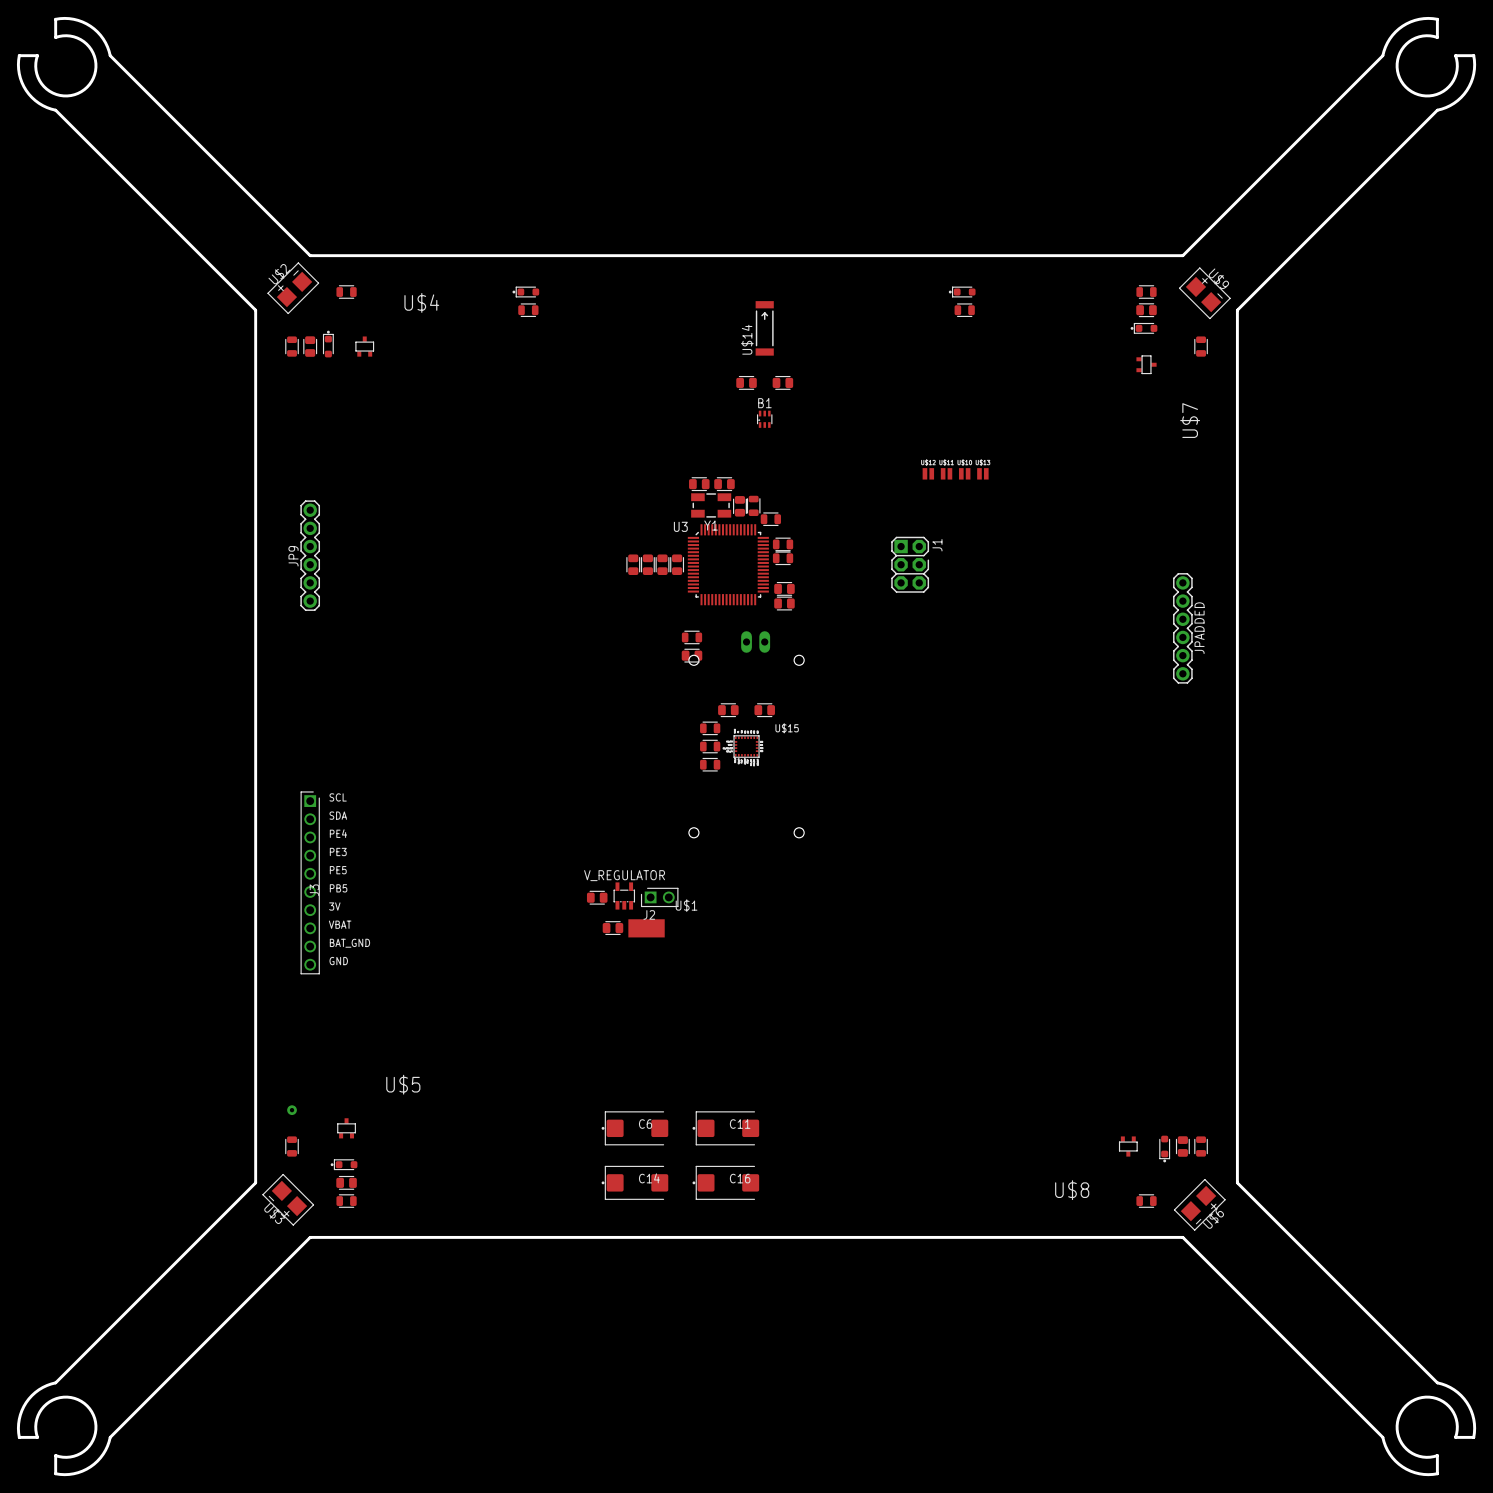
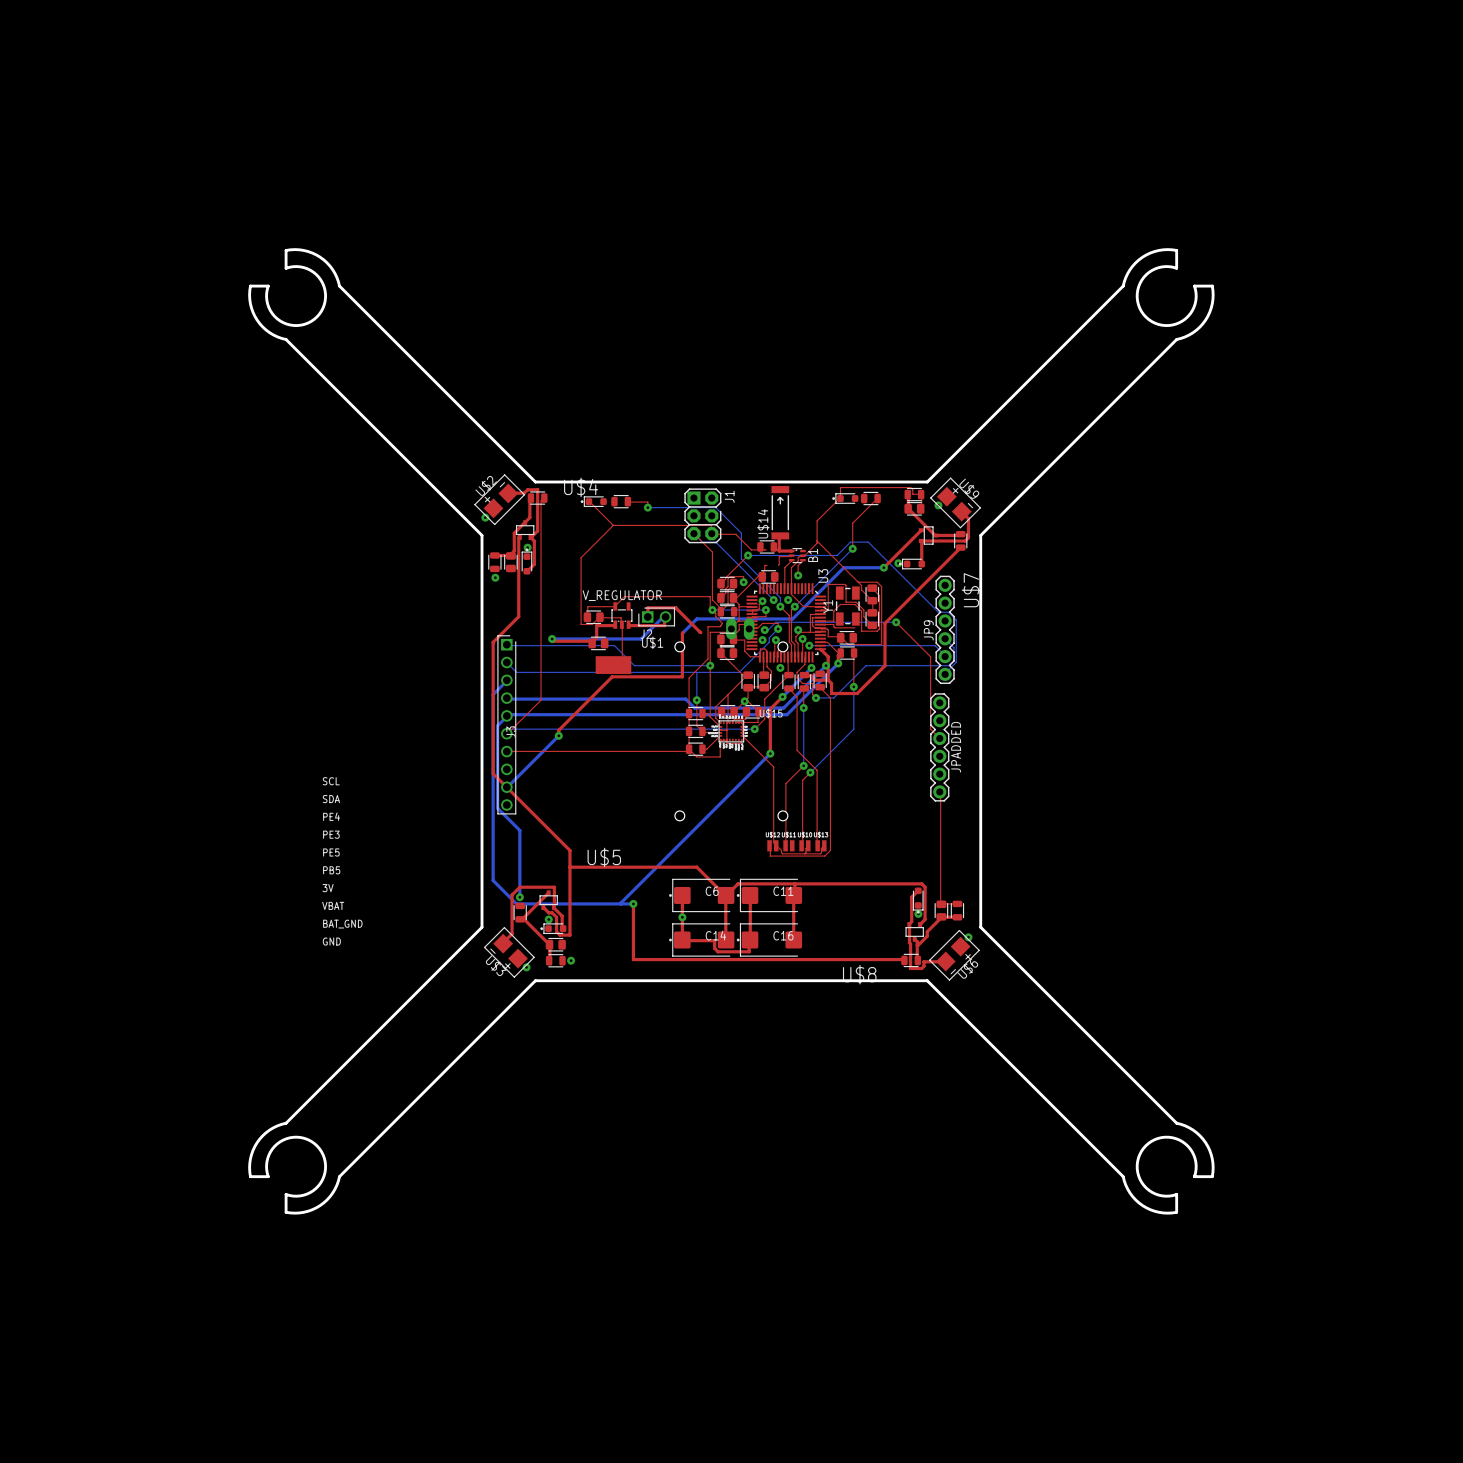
board edge: (55, 19) (55, 37) (66, 35) (77, 38) (91, 49) (95, 63) (93, 78) (87, 87) (78, 93) (67, 95) (56, 94) (44, 86) (38, 77) (35, 66) (37, 55) (19, 55) (19, 73) (26, 90) (38, 103) (55, 110) (255, 310) (255, 1182) (55, 1382) (42, 1387) (31, 1395) (20, 1414) (19, 1437) (37, 1437) (35, 1426) (38, 1415) (49, 1401) (63, 1397) (78, 1399) (87, 1405) (93, 1415) (95, 1425) (94, 1436) (86, 1449) (77, 1455) (66, 1457) (55, 1455) (55, 1473) (73, 1473) (90, 1466) (103, 1454) (110, 1437) (310, 1237) (1182, 1237) (1382, 1437) (1387, 1450) (1395, 1461) (1414, 1472) (1437, 1473) (1437, 1455) (1426, 1457) (1415, 1455) (1401, 1443) (1397, 1429) (1399, 1415) (1405, 1405) (1415, 1399) (1425, 1397) (1436, 1398) (1449, 1406) (1455, 1415) (1457, 1426) (1455, 1437) (1473, 1437) (1473, 1419) (1466, 1402) (1454, 1389) (1437, 1382) (1237, 1182) (1237, 310) (1437, 110) (1450, 105) (1461, 97) (1472, 78) (1473, 55) (1455, 55) (1457, 66) (1455, 77) (1443, 91) (1429, 95) (1415, 93) (1405, 87) (1399, 78) (1397, 67) (1398, 56) (1406, 44) (1415, 38) (1426, 35) (1437, 37) (1437, 19) (1419, 19) (1402, 26) (1389, 38) (1382, 55) (1182, 255) (310, 255) (110, 55) (105, 42) (97, 31) (78, 20) (55, 19) -> none
board edge: none -> (286, 250) (286, 268) (296, 266) (307, 268) (321, 280) (325, 293) (323, 308) (316, 316) (308, 323) (297, 325) (286, 324) (274, 316) (268, 307) (266, 296) (268, 286) (250, 286) (250, 303) (257, 320) (269, 332) (286, 339) (482, 535) (482, 927) (286, 1123) (273, 1127) (262, 1135) (251, 1154) (250, 1176) (268, 1176) (266, 1165) (268, 1155) (280, 1141) (293, 1137) (308, 1139) (316, 1145) (323, 1154) (325, 1165) (324, 1175) (316, 1188) (307, 1193) (296, 1196) (286, 1194) (286, 1212) (303, 1212) (320, 1205) (332, 1193) (339, 1176) (535, 980) (927, 980) (1123, 1176) (1127, 1189) (1135, 1199) (1154, 1211) (1176, 1212) (1176, 1194) (1165, 1196) (1155, 1193) (1141, 1182) (1137, 1168) (1139, 1154) (1145, 1145) (1154, 1139) (1165, 1137) (1175, 1138) (1188, 1146) (1193, 1155) (1196, 1165) (1194, 1176) (1212, 1176) (1212, 1158) (1205, 1142) (1193, 1130) (1176, 1123) (980, 927) (980, 535) (1176, 339) (1189, 335) (1199, 327) (1211, 308) (1212, 286) (1194, 286) (1196, 296) (1193, 307) (1182, 321) (1168, 325) (1154, 323) (1145, 316) (1139, 308) (1137, 297) (1138, 286) (1146, 274) (1155, 268) (1165, 266) (1176, 268) (1176, 250) (1158, 250) (1142, 257) (1130, 269) (1123, 286) (927, 482) (535, 482) (339, 286) (335, 273) (327, 262) (308, 251) (286, 250)
U$2 position: (293, 288) -> (499, 499)
part: (346, 292) -> none
part: (525, 292) -> none
part: (962, 292) -> none
part: (1146, 292) -> none
U$9 position: (1204, 293) -> (955, 502)
part: (528, 310) -> none
part: (964, 310) -> none
part: (1146, 310) -> none
U$14 position: (764, 328) -> (780, 512)
part: (1144, 328) -> none
part: (328, 344) -> none
part: (292, 346) -> none
part: (310, 346) -> none
U$4 position: (364, 346) -> (525, 530)
part: (1201, 346) -> none
U$7 position: (1146, 364) -> (928, 535)
part: (746, 382) -> none
part: (782, 382) -> none
B1 rotation: 0° (764, 419) -> 90° clockwise (797, 555)
B1 position: (764, 419) -> (797, 555)
part position: (928, 473) -> (772, 845)
part position: (946, 473) -> (788, 845)
part position: (964, 473) -> (804, 845)
part position: (982, 473) -> (820, 845)
part: (699, 484) -> none
part: (724, 484) -> none
top track: none -> (508, 493) (524, 493) (527, 489) (537, 489) (537, 530) (530, 537) (534, 541) (534, 564) (526, 571)
top track: none -> (907, 494) (908, 508) (935, 535) (960, 534)
part: none -> (914, 494)
Y1 rotation: 0° (711, 505) -> 90° clockwise (847, 606)
Y1 position: (711, 505) -> (847, 606)
part: (753, 505) -> none
part: (739, 506) -> none
top track: none -> (530, 498) (529, 517) (514, 533) (514, 551) (510, 555) (494, 555)
part: none -> (537, 498)
top track: none -> (544, 498) (541, 500) (541, 700) (506, 733)
part: none -> (845, 498)
part: none -> (870, 498)
top track: none -> (877, 498) (852, 523) (852, 548)
top track: none -> (588, 501) (613, 525)
part: none -> (593, 501)
part: none -> (621, 501)
top track: none -> (627, 501) (647, 502) (647, 507)
via: none -> (938, 505)
bottom track: none -> (647, 507) (715, 507) (741, 533) (741, 558) (780, 597) (780, 606)
via: none -> (647, 507)
part: (770, 519) -> none
part: none -> (914, 508)
top track: none -> (920, 508) (921, 495) (912, 494) (910, 487) (840, 487) (840, 498) (817, 520) (817, 543) (803, 556) (799, 556) (798, 561) (791, 567) (791, 594) (803, 606) (820, 607)
top track: none -> (961, 511) (968, 518) (968, 537) (965, 541) (921, 540) (921, 564)
via: none -> (485, 517)
top track: none -> (613, 525) (711, 525) (712, 534) (735, 534) (751, 549) (766, 549)
top track: none -> (613, 525) (581, 557) (581, 624) (592, 624) (599, 617) (621, 617) (622, 665)
top track: none -> (921, 530) (883, 567)
top track: none -> (693, 533) (712, 552) (712, 600) (722, 610) (720, 611) (728, 604) (728, 589) (733, 583)
bottom track: none -> (693, 533) (702, 542) (715, 542) (773, 600)
part: (783, 544) -> none
top track: none -> (780, 535) (779, 551) (791, 551)
top track: none -> (519, 537) (518, 616) (493, 642) (493, 773) (569, 850) (569, 935) (559, 935) (556, 931) (556, 917) (543, 907)
top track: none -> (817, 541) (861, 585) (861, 589) (872, 601) (872, 612)
part: none -> (960, 540)
JP9 position: (310, 555) -> (945, 629)
via: none -> (527, 547)
top track: none -> (960, 547) (885, 623) (885, 665) (857, 693) (831, 693) (831, 683) (828, 680)
bottom track: none -> (852, 548) (794, 606)
via: none -> (852, 548)
part: (633, 564) -> none
part: (647, 564) -> none
part: (662, 564) -> none
part: (677, 564) -> none
U3 rotation: 0° (728, 564) -> 90° clockwise (786, 622)
U3 position: (728, 564) -> (786, 622)
J1 position: (910, 564) -> (702, 515)
top track: none -> (748, 555) (721, 583)
bottom track: none -> (748, 555) (837, 555) (850, 542) (868, 542) (938, 612) (948, 612) (956, 620) (956, 662) (945, 674)
via: none -> (748, 555)
top track: none -> (791, 555) (779, 556) (778, 565)
top track: none -> (791, 560) (784, 567) (784, 588)
top track: none -> (802, 560) (798, 565) (798, 575)
part: none -> (494, 562)
part: none -> (510, 562)
part: none -> (526, 561)
via: none -> (898, 563)
part: none -> (911, 564)
top track: none -> (766, 565) (764, 565) (764, 569) (734, 600) (733, 597) (733, 598) (739, 604) (739, 621)
bottom track: none -> (883, 567) (843, 567) (792, 618) (696, 618) (683, 632)
via: none -> (883, 567)
via: none -> (798, 575)
via: none -> (495, 577)
top track: none -> (743, 582) (743, 576) (730, 576) (728, 578) (725, 593) (720, 597)
via: none -> (743, 582)
top track: none -> (858, 582) (877, 582) (881, 586) (881, 644) (848, 644) (840, 636) (828, 636) (827, 628) (814, 627) (812, 625) (812, 617) (820, 617)
part: none -> (727, 583)
top track: none -> (872, 588) (879, 595) (879, 628) (877, 631) (861, 631) (861, 611) (854, 604) (840, 604) (833, 611) (833, 621) (820, 621)
part: (784, 603) -> none
part: none -> (872, 594)
part: none -> (727, 597)
via: none -> (773, 600)
via: none -> (788, 600)
top track: none -> (762, 601) (759, 604) (759, 608) (752, 610) (751, 614)
via: none -> (762, 601)
top track: none -> (739, 606) (751, 607)
top track: none -> (780, 606) (789, 615) (791, 657)
via: none -> (780, 606)
top track: none -> (794, 606) (791, 610) (791, 641) (794, 644) (794, 657)
via: none -> (794, 606)
bottom track: none -> (712, 610) (765, 610)
via: none -> (712, 610)
top track: none -> (765, 610) (765, 616) (751, 617)
via: none -> (765, 610)
top track: none -> (820, 610) (828, 608) (828, 584) (844, 584) (846, 602) (856, 602) (863, 610) (863, 616) (872, 625)
part: none -> (727, 611)
top track: none -> (820, 614) (810, 614) (810, 632)
V_REGULATOR: none -> (621, 615)
JPADDED: (1182, 628) -> none
top track: none -> (647, 616) (647, 607) (675, 607) (700, 632)
top track: none -> (665, 616) (664, 625) (628, 624)
bottom track: none -> (665, 616) (662, 617) (641, 638) (552, 638)
top track: none -> (587, 617) (587, 606) (614, 606) (624, 596) (710, 596) (710, 607) (722, 623) (720, 626) (707, 626) (707, 659) (689, 677) (689, 749)
part: none -> (593, 617)
part: none -> (872, 619)
top track: none -> (751, 621) (738, 621) (733, 625)
top track: none -> (896, 622) (930, 656) (930, 729) (939, 738)
bottom track: none -> (896, 622) (775, 622) (768, 630) (764, 630)
via: none -> (896, 622)
top track: none -> (615, 624) (596, 625) (596, 637) (592, 643) (591, 641) (552, 641) (552, 638)
part: (691, 637) -> none
top track: none -> (751, 624) (739, 624) (739, 630) (736, 632) (710, 632) (710, 716)
top track: none -> (820, 624) (833, 624) (834, 627) (854, 627)
top track: none -> (751, 628) (758, 627) (762, 623) (778, 623) (778, 628)
bottom track: none -> (778, 628) (769, 637) (769, 642) (739, 672) (516, 672) (506, 662)
via: none -> (778, 628)
via: none -> (764, 630)
via: none -> (798, 630)
top track: none -> (820, 631) (800, 632)
top track: none -> (683, 632) (682, 676) (612, 676) (558, 730) (558, 735)
top track: none -> (800, 632) (795, 636) (798, 657)
part: none -> (846, 637)
bottom track: none -> (945, 638) (954, 647) (954, 660) (948, 665) (866, 665) (833, 697) (815, 697)
via: none -> (552, 638)
top track: none -> (720, 639) (720, 653) (744, 677) (748, 675) (715, 706) (715, 718) (720, 722)
part: none -> (727, 639)
top track: none -> (733, 639) (744, 640) (744, 651) (750, 656) (759, 657) (760, 648) (764, 648) (766, 651) (766, 666) (771, 671) (771, 680) (764, 687) (749, 686) (748, 697) (734, 711)
top track: none -> (802, 638) (801, 657)
via: none -> (802, 638)
via: none -> (762, 640)
top track: none -> (775, 640) (773, 657)
via: none -> (775, 640)
part: (691, 655) -> none
top track: none -> (820, 642) (827, 642) (840, 654) (840, 653) (840, 653) (838, 655) (838, 663)
part: none -> (598, 643)
bottom track: none -> (506, 644) (614, 645) (634, 665) (710, 665)
top track: none -> (783, 645) (778, 650) (777, 657)
bottom track: none -> (809, 645) (935, 645) (945, 656)
via: none -> (809, 645)
top track: none -> (820, 649) (828, 656) (828, 680)
part: none -> (727, 653)
part: none -> (847, 653)
top track: none -> (854, 653) (853, 686)
top track: none -> (763, 657) (764, 675)
top track: none -> (787, 657) (788, 675) (764, 699) (764, 719) (754, 729)
top track: none -> (805, 657) (804, 664) (797, 672) (797, 677) (802, 683) (812, 683) (812, 694) (815, 697)
bottom track: none -> (838, 663) (787, 714) (507, 714) (497, 725) (497, 808) (519, 830) (519, 897)
via: none -> (838, 663)
via: none -> (710, 665)
bottom track: none -> (826, 665) (783, 707) (694, 707) (685, 699) (506, 698)
via: none -> (826, 665)
via: none -> (780, 667)
bottom track: none -> (811, 667) (782, 696)
via: none -> (811, 667)
bottom track: none -> (696, 672) (696, 700)
top track: none -> (804, 675) (811, 675) (814, 680) (828, 680)
bottom track: none -> (506, 680) (493, 694) (493, 880) (516, 903) (633, 903)
part: none -> (820, 680)
part: none -> (748, 681)
part: none -> (764, 681)
part: none -> (788, 681)
part: none -> (804, 681)
top track: none -> (820, 687) (830, 697) (830, 850) (824, 856) (770, 856) (769, 845)
bottom track: none -> (853, 686) (853, 729) (810, 772)
via: none -> (853, 686)
top track: none -> (788, 688) (797, 696) (797, 750) (817, 770) (817, 845)
top track: none -> (804, 688) (803, 707)
top track: none -> (728, 694) (728, 722)
part: (728, 710) -> none
part: (764, 710) -> none
top track: none -> (782, 696) (770, 709) (770, 753)
via: none -> (782, 696)
via: none -> (815, 697)
top track: none -> (746, 699) (759, 711) (758, 722) (741, 722)
top track: none -> (696, 700) (696, 725) (703, 732) (721, 732)
via: none -> (696, 700)
via: none -> (744, 701)
bottom track: none -> (803, 707) (803, 765)
via: none -> (803, 707)
part: none -> (727, 711)
top track: none -> (746, 711) (745, 719) (734, 719) (732, 722)
part: none -> (752, 711)
top track: none -> (702, 713) (706, 713) (721, 726)
top track: none -> (729, 722) (726, 722) (726, 730)
top track: none -> (735, 722) (741, 722)
top track: none -> (741, 722) (742, 735)
top track: none -> (721, 729) (726, 730)
bottom track: none -> (754, 729) (512, 729) (506, 733)
via: none -> (754, 729)
top track: none -> (726, 730) (726, 740)
bottom track: none -> (558, 735) (506, 787)
via: none -> (558, 735)
top track: none -> (721, 735) (706, 749) (702, 749)
top track: none -> (742, 735) (773, 766) (773, 842) (782, 853) (820, 853) (824, 845)
top track: none -> (726, 740) (720, 740) (720, 756) (696, 756) (689, 749)
top track: none -> (741, 739) (740, 743) (726, 743) (726, 740)
JPADDED: none -> (939, 747)
top track: none -> (689, 749) (687, 751) (506, 751)
bottom track: none -> (770, 753) (621, 903)
via: none -> (770, 753)
top track: none -> (803, 765) (785, 783) (785, 845)
via: none -> (803, 765)
top track: none -> (810, 772) (802, 780) (801, 845)
via: none -> (810, 772)
top track: none -> (939, 791) (940, 903) (957, 903)
top track: none -> (808, 845) (804, 853)
J3 position: (310, 882) -> (506, 724)
top track: none -> (569, 867) (696, 867) (726, 895)
V_REGULATOR: (624, 895) -> none
part: (597, 897) -> none
J2 position: (659, 897) -> (656, 616)
top track: none -> (794, 883) (793, 939)
top track: none -> (918, 890) (911, 897) (911, 921) (909, 924) (910, 968) (921, 968) (923, 961) (945, 961)
top track: none -> (548, 892) (520, 919) (524, 919) (549, 945) (549, 960)
top track: none -> (682, 895) (682, 939) (714, 940) (714, 948) (718, 951) (749, 951) (750, 895)
top track: none -> (726, 895) (726, 939)
top track: none -> (726, 895) (738, 883) (921, 883) (925, 887) (925, 919) (920, 924)
via: none -> (519, 897)
part: none -> (918, 900)
top track: none -> (633, 903) (633, 959) (904, 960)
via: none -> (633, 903)
part: (612, 928) -> none
U$1 position: (646, 928) -> (613, 665)
part: none -> (941, 910)
part: none -> (957, 910)
part: none -> (520, 912)
via: none -> (918, 913)
via: none -> (682, 917)
top track: none -> (957, 917) (941, 916) (927, 931) (927, 936) (917, 945)
via: none -> (548, 919)
part: none -> (553, 928)
top track: none -> (563, 928) (562, 916) (554, 907) (554, 887) (519, 887) (512, 895) (512, 933) (503, 943)
via: none -> (968, 937)
top track: none -> (914, 939) (917, 941) (917, 960)
part: none -> (555, 944)
part: none -> (555, 960)
via: none -> (571, 960)
part: none -> (911, 960)
via: none -> (526, 967)
via: (292, 1110) -> none
U$5 position: (346, 1128) -> (548, 900)
C6 position: (634, 1128) -> (701, 895)
C11 position: (725, 1128) -> (769, 895)
part: (292, 1146) -> none
U$8 position: (1128, 1146) -> (914, 931)
part: (1182, 1146) -> none
part: (1201, 1146) -> none
part: (1164, 1149) -> none
part: (344, 1164) -> none
part: (346, 1182) -> none
C14 position: (634, 1182) -> (701, 939)
C16 position: (725, 1182) -> (769, 939)
U$3 position: (288, 1199) -> (509, 952)
part: (346, 1201) -> none
part: (1146, 1201) -> none
U$6 position: (1199, 1204) -> (954, 955)

